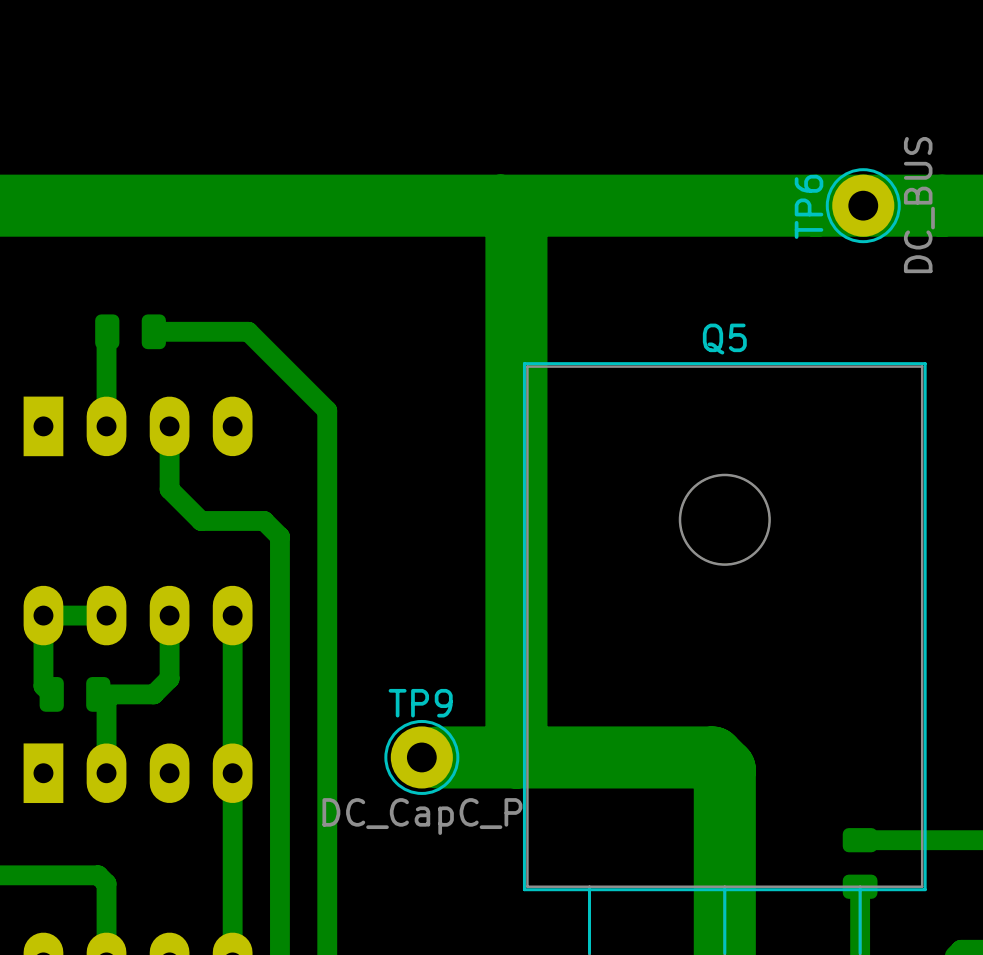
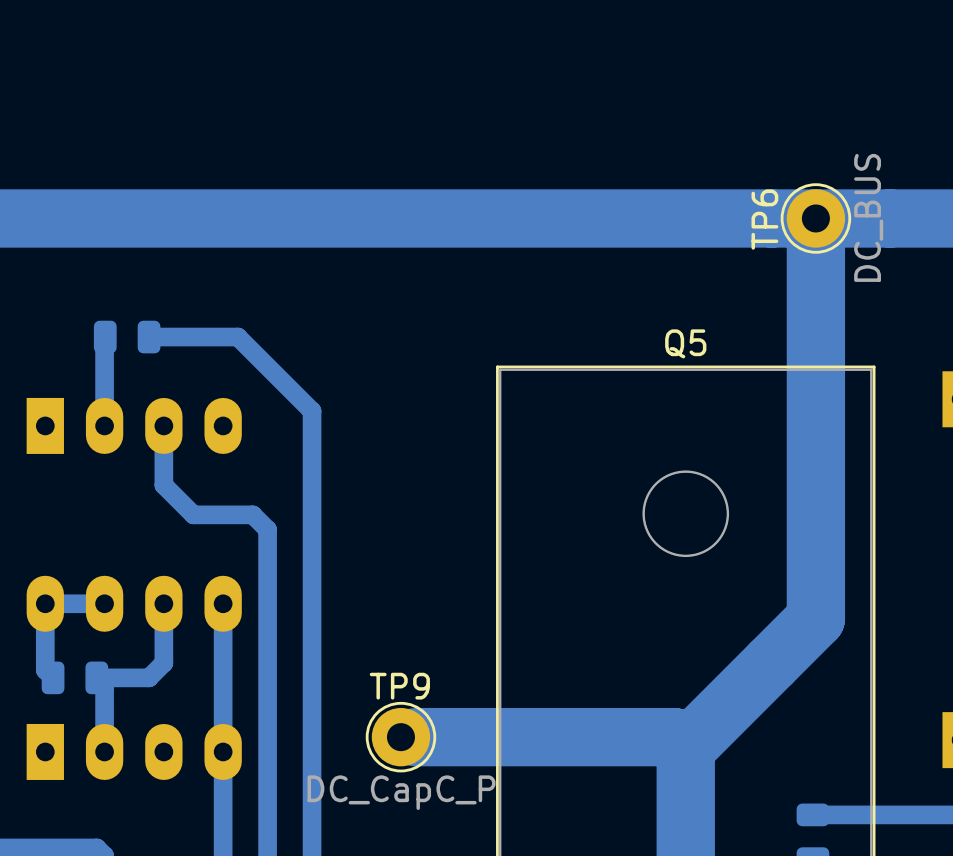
bottom track: (500, 205) (516, 221) (516, 757) -> none
bottom track: none -> (815, 218) (815, 618) (685, 748)

